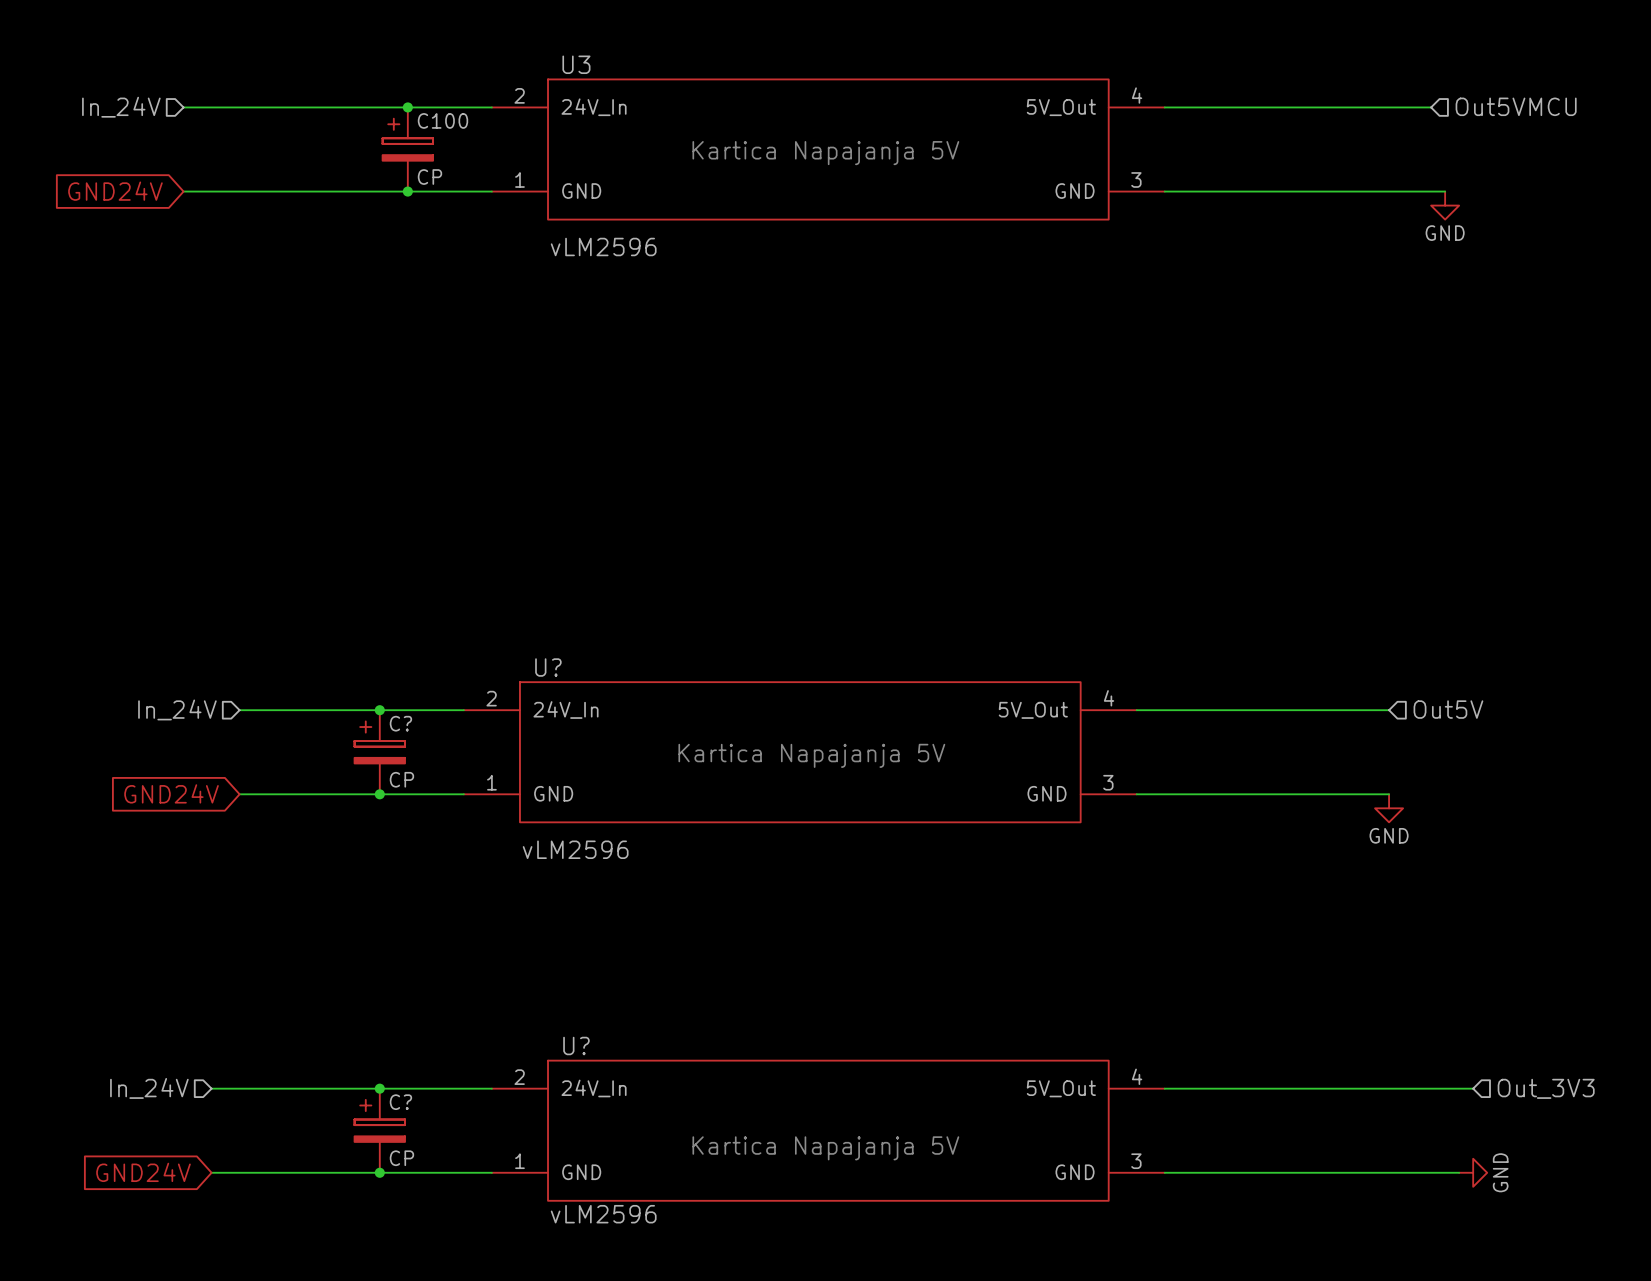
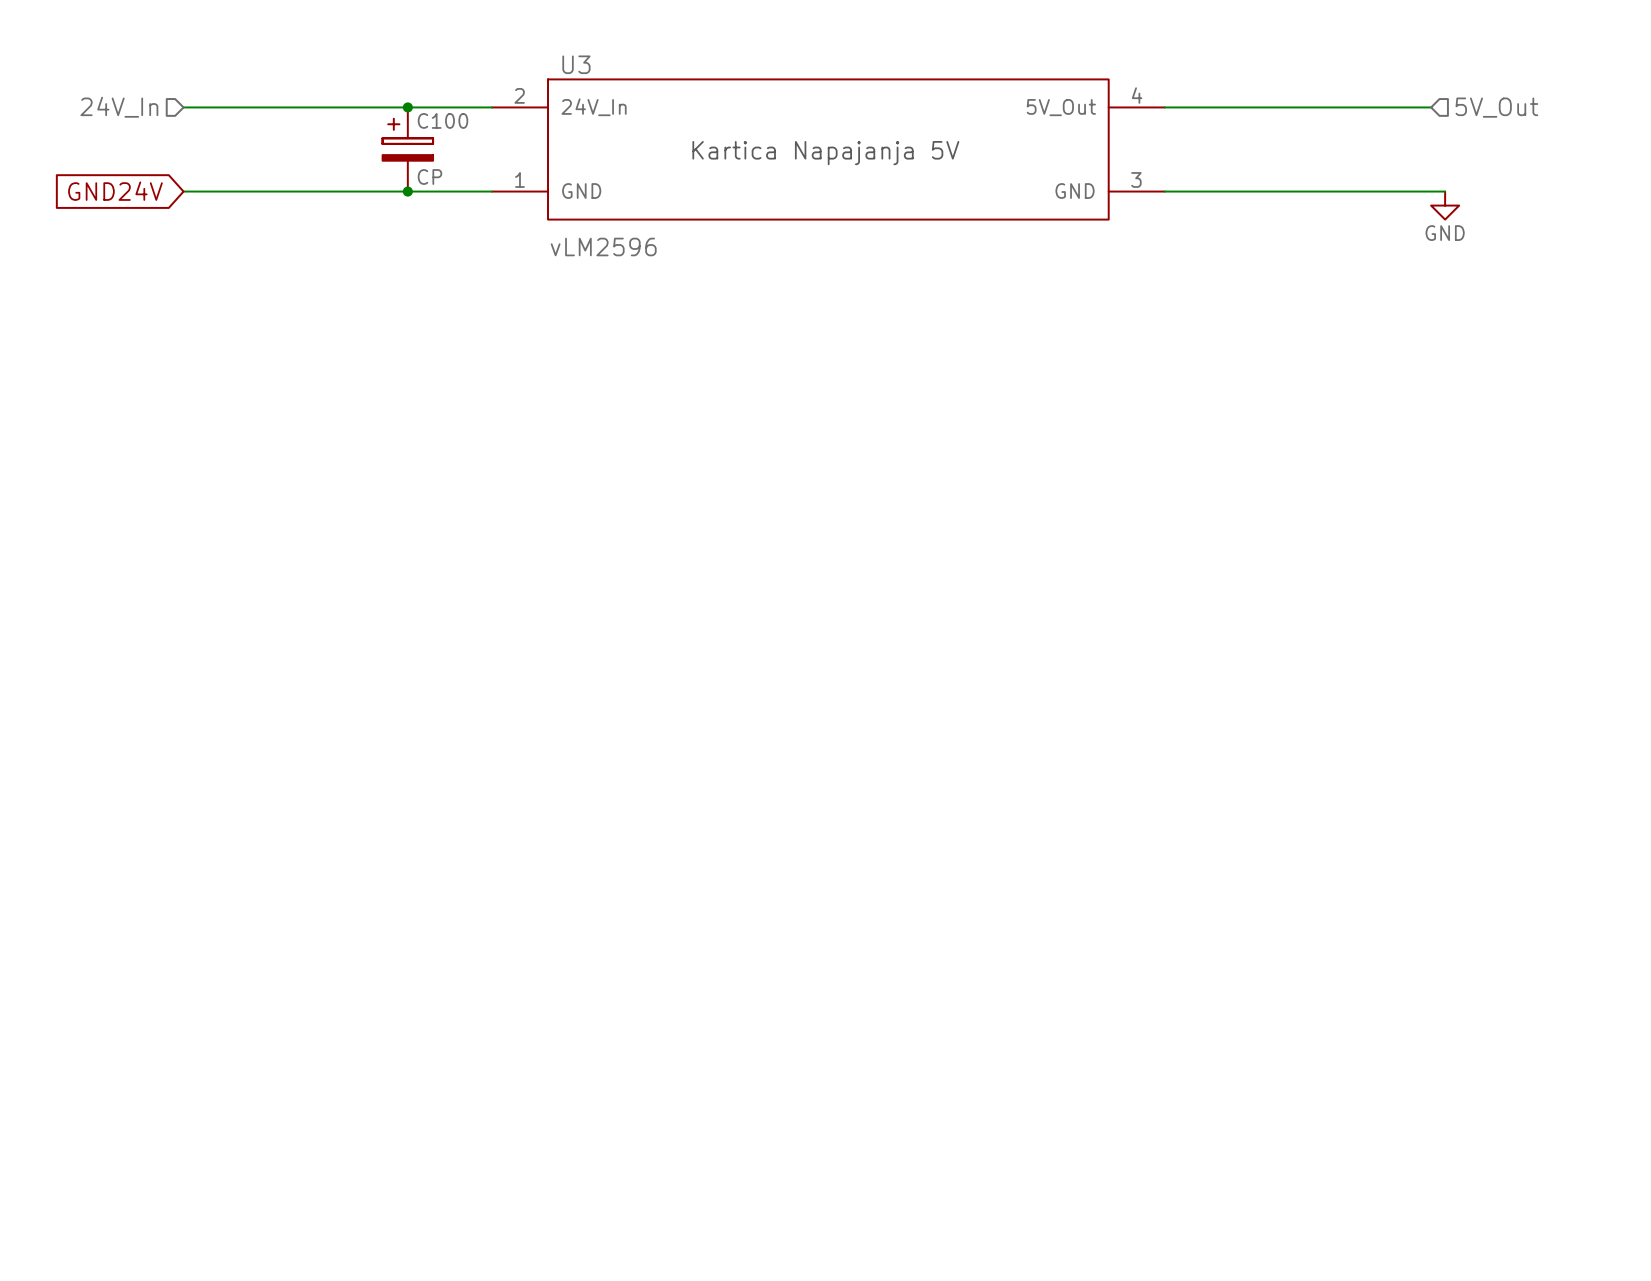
hierarchical label: Out5VMCU (1516, 106) -> 5V_Out (1496, 107)
hierarchical label: In_24V (121, 107) -> 24V_In (119, 107)
hierarchical label: In_24V (177, 709) -> none
hierarchical label: Out5V (1448, 709) -> none
wire: (239, 710) (463, 710) -> none
junction: (379, 710) -> none
wire: (1136, 710) (1389, 710) -> none
C?: CP (379, 752) -> none
U?: vLM2596 (800, 752) -> none
text: Kartica Napajanja 5V (811, 755) -> none
global label: GND24V (171, 793) -> none
wire: (239, 794) (463, 794) -> none
junction: (379, 794) -> none
wire: (1136, 794) (1389, 794) -> none
power symbol: GND (1389, 808) -> none
hierarchical label: In_24V (149, 1088) -> none
wire: (211, 1088) (491, 1088) -> none
junction: (379, 1088) -> none
wire: (1164, 1088) (1473, 1088) -> none
hierarchical label: Out_3V3 (1546, 1088) -> none
C?: CP (379, 1130) -> none
U?: vLM2596 (828, 1130) -> none
text: Kartica Napajanja 5V (825, 1148) -> none
global label: GND24V (143, 1172) -> none
wire: (211, 1172) (491, 1172) -> none
junction: (379, 1172) -> none
wire: (1164, 1172) (1459, 1172) -> none
power symbol: GND (1473, 1172) -> none

